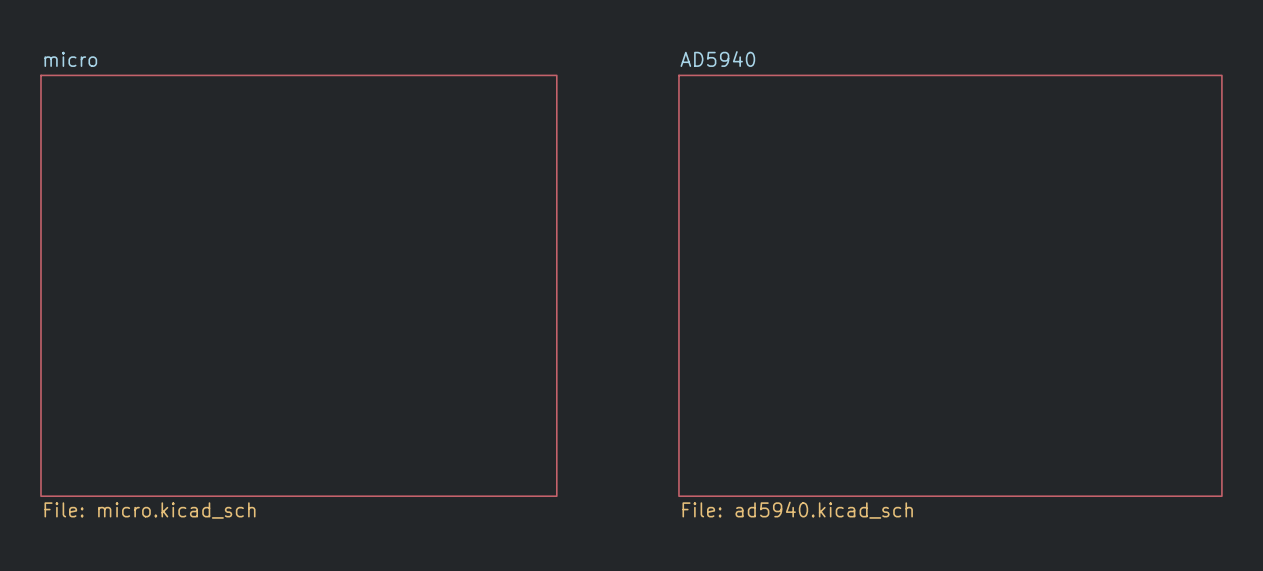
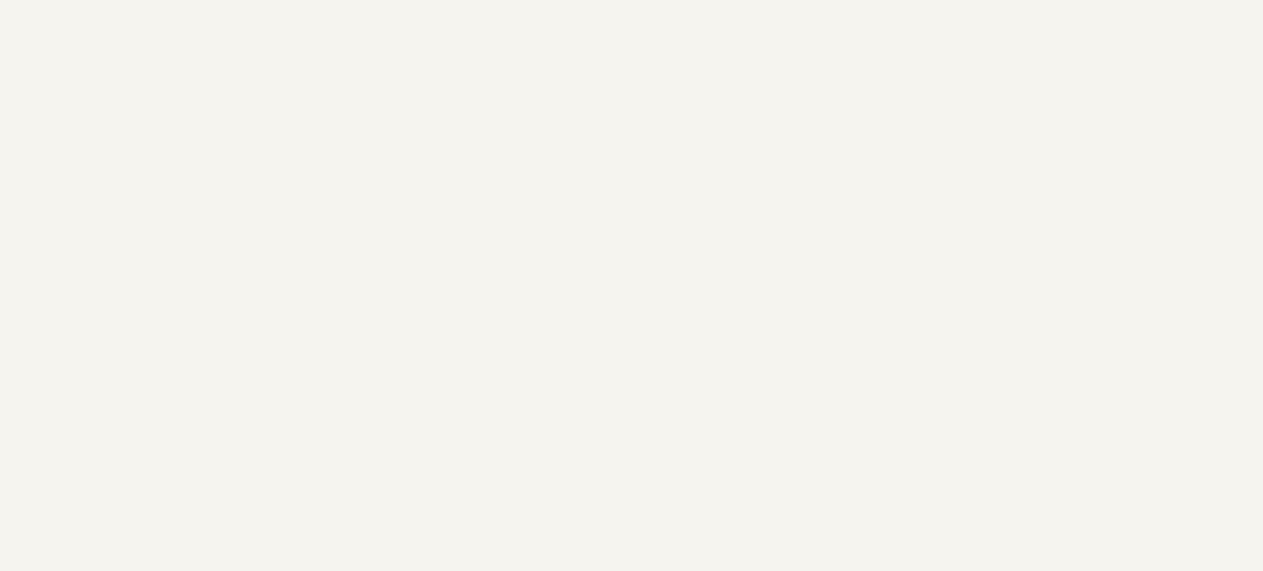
sheet micro: File: micro.kicad_sch (298, 285) -> none
sheet AD5940: File: ad5940.kicad_sch (950, 285) -> none

